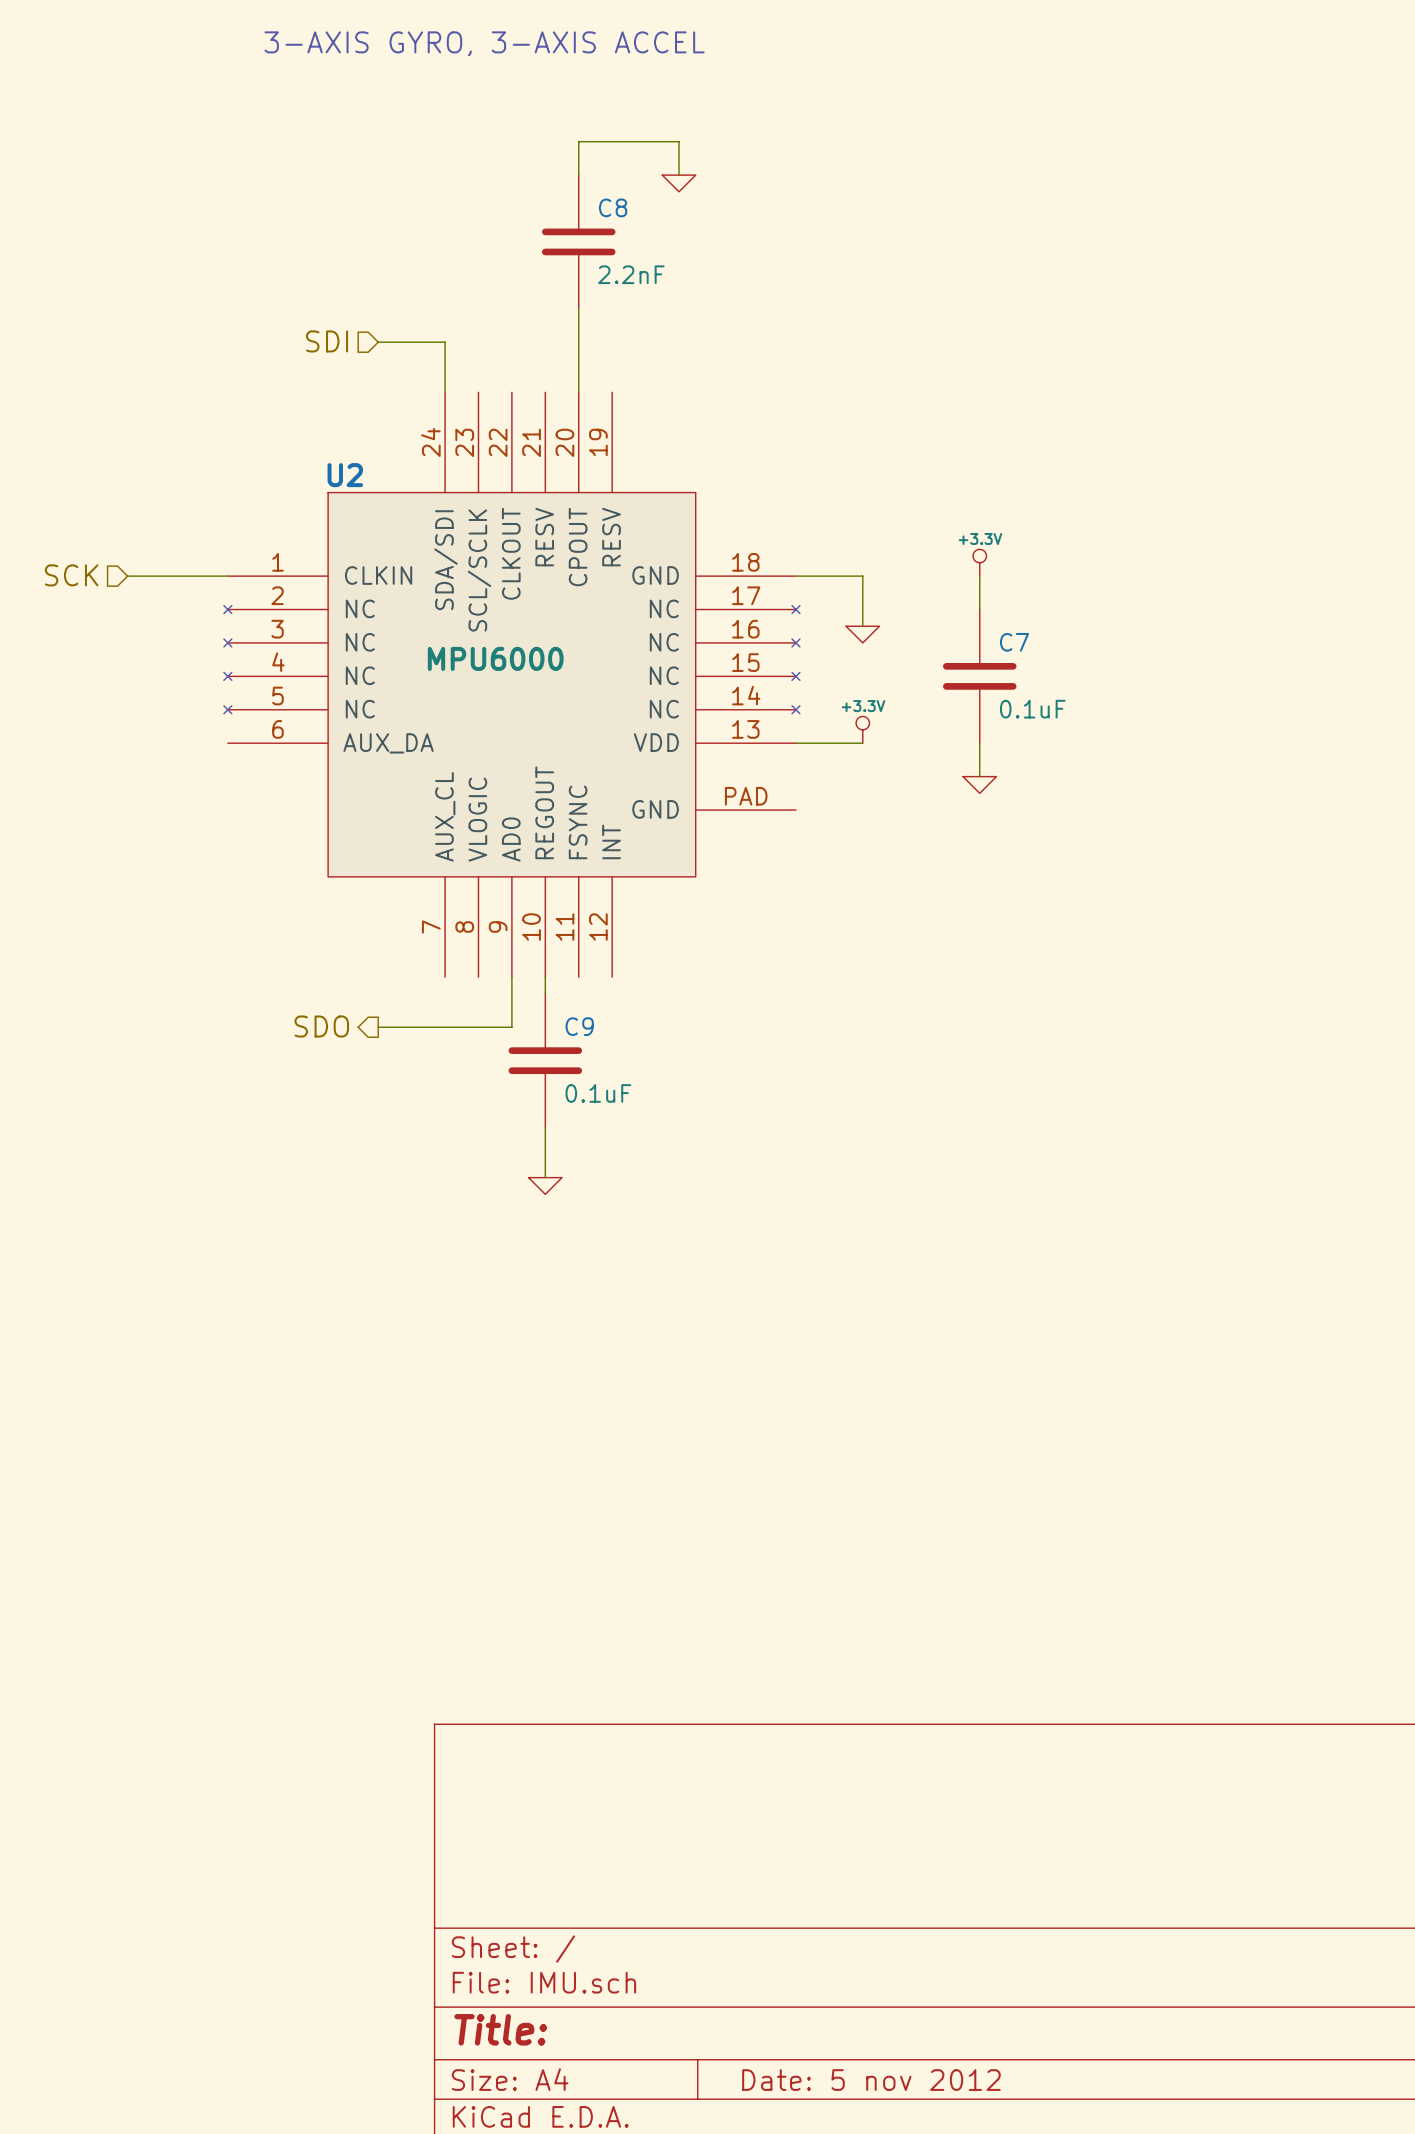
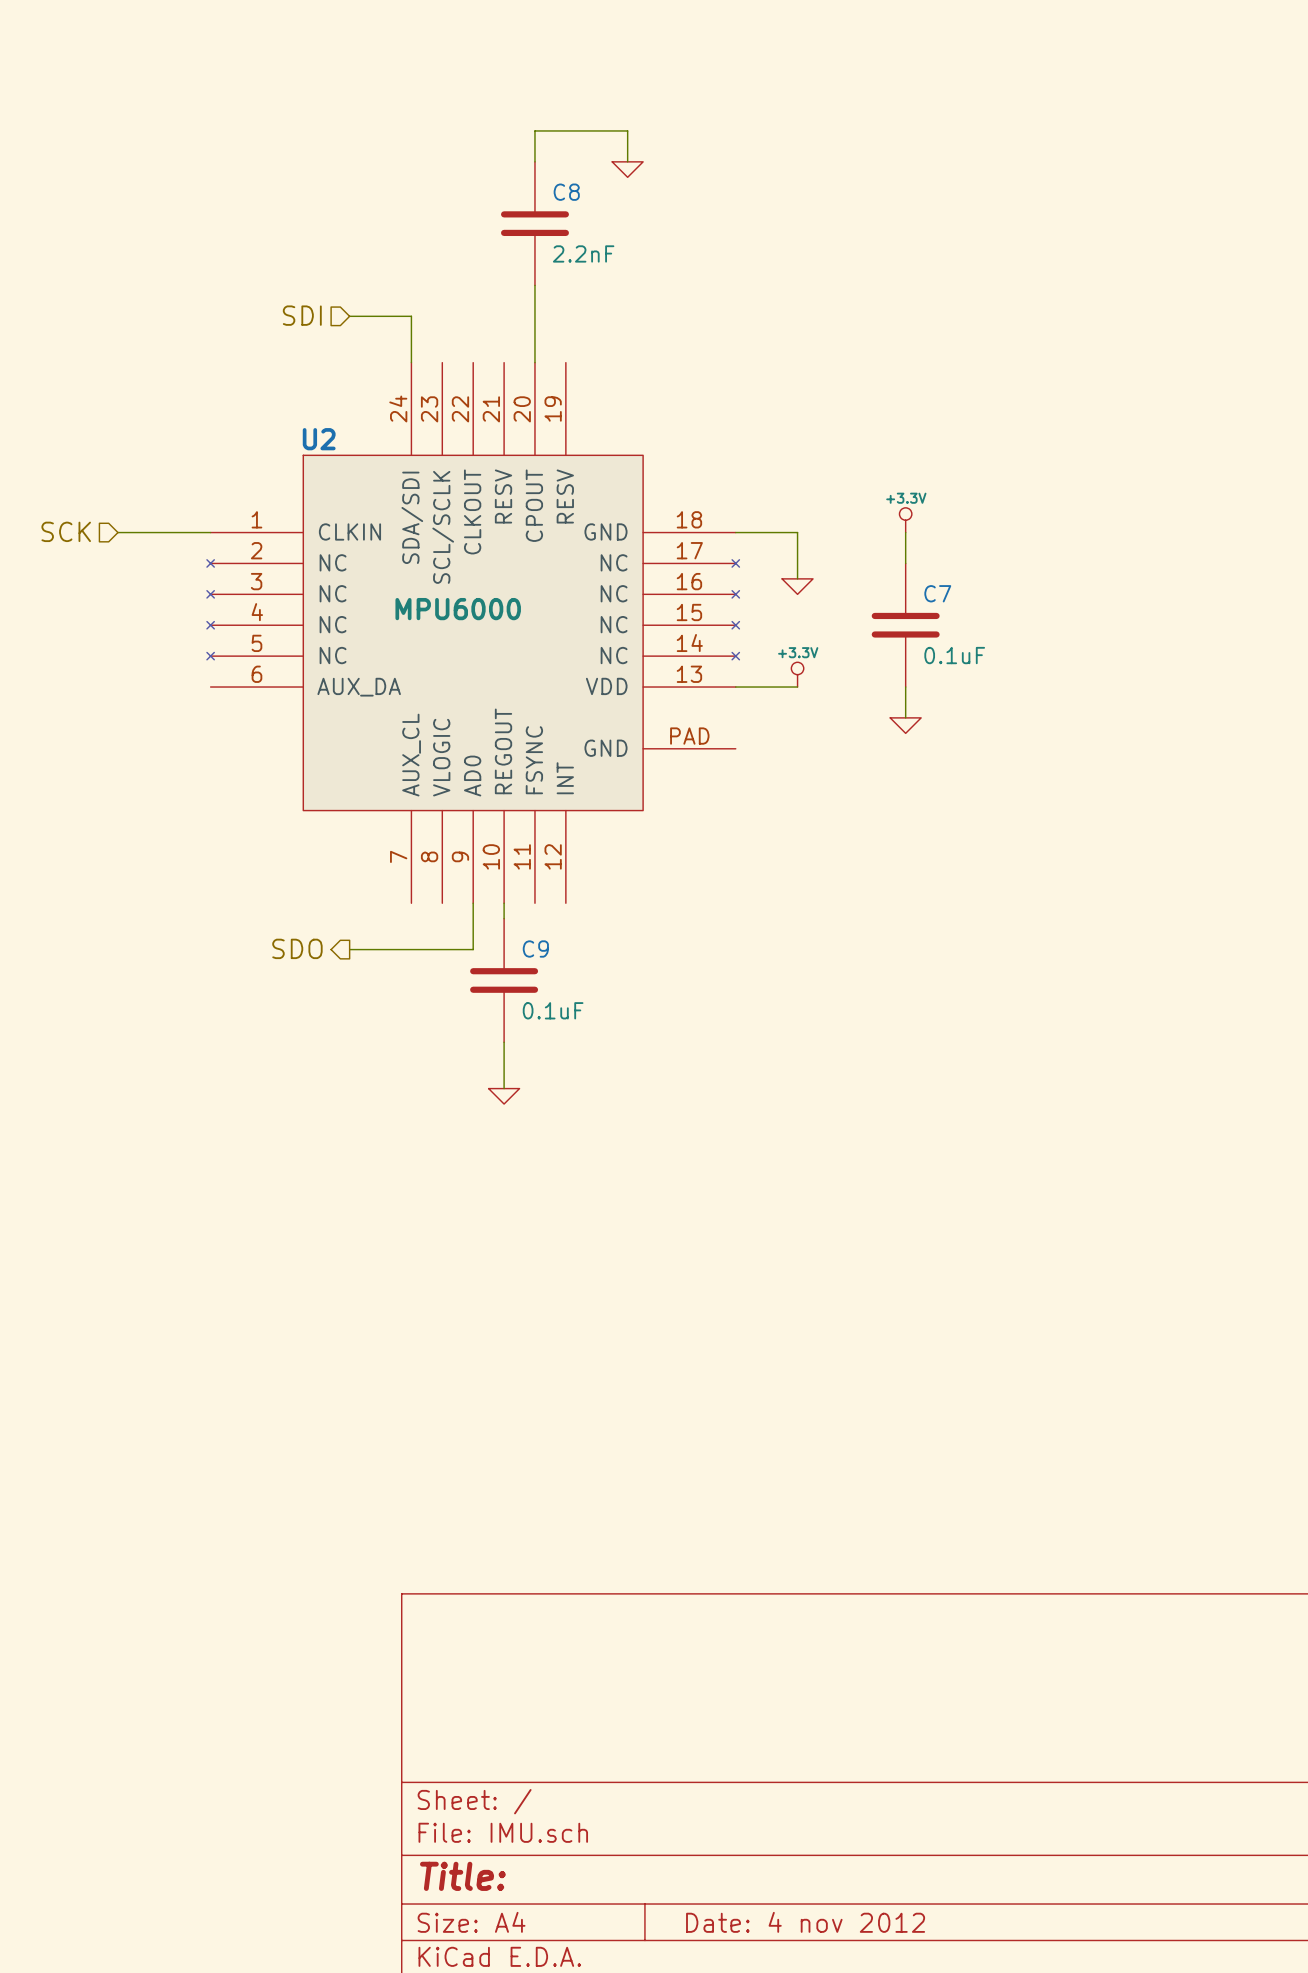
text: 3-AXIS GYRO, 3-AXIS ACCEL (484, 43) -> none
title block: Date: 5 nov 2012 (871, 2080) -> Date: 4 nov 2012 (805, 1922)

